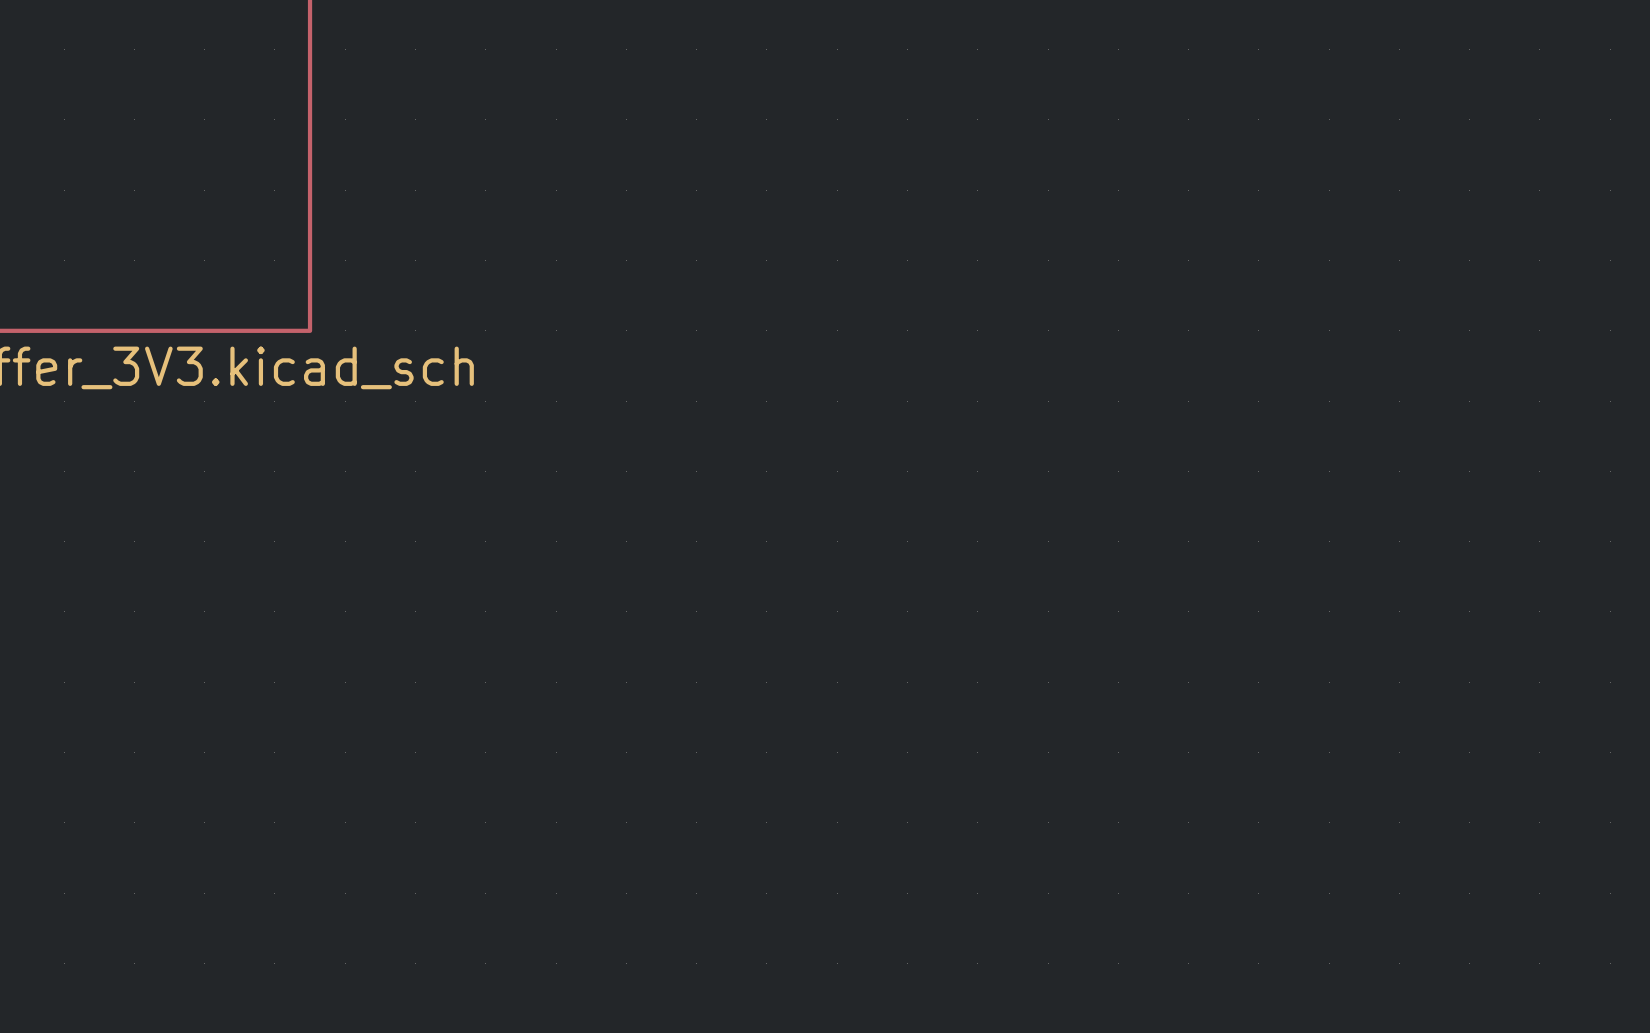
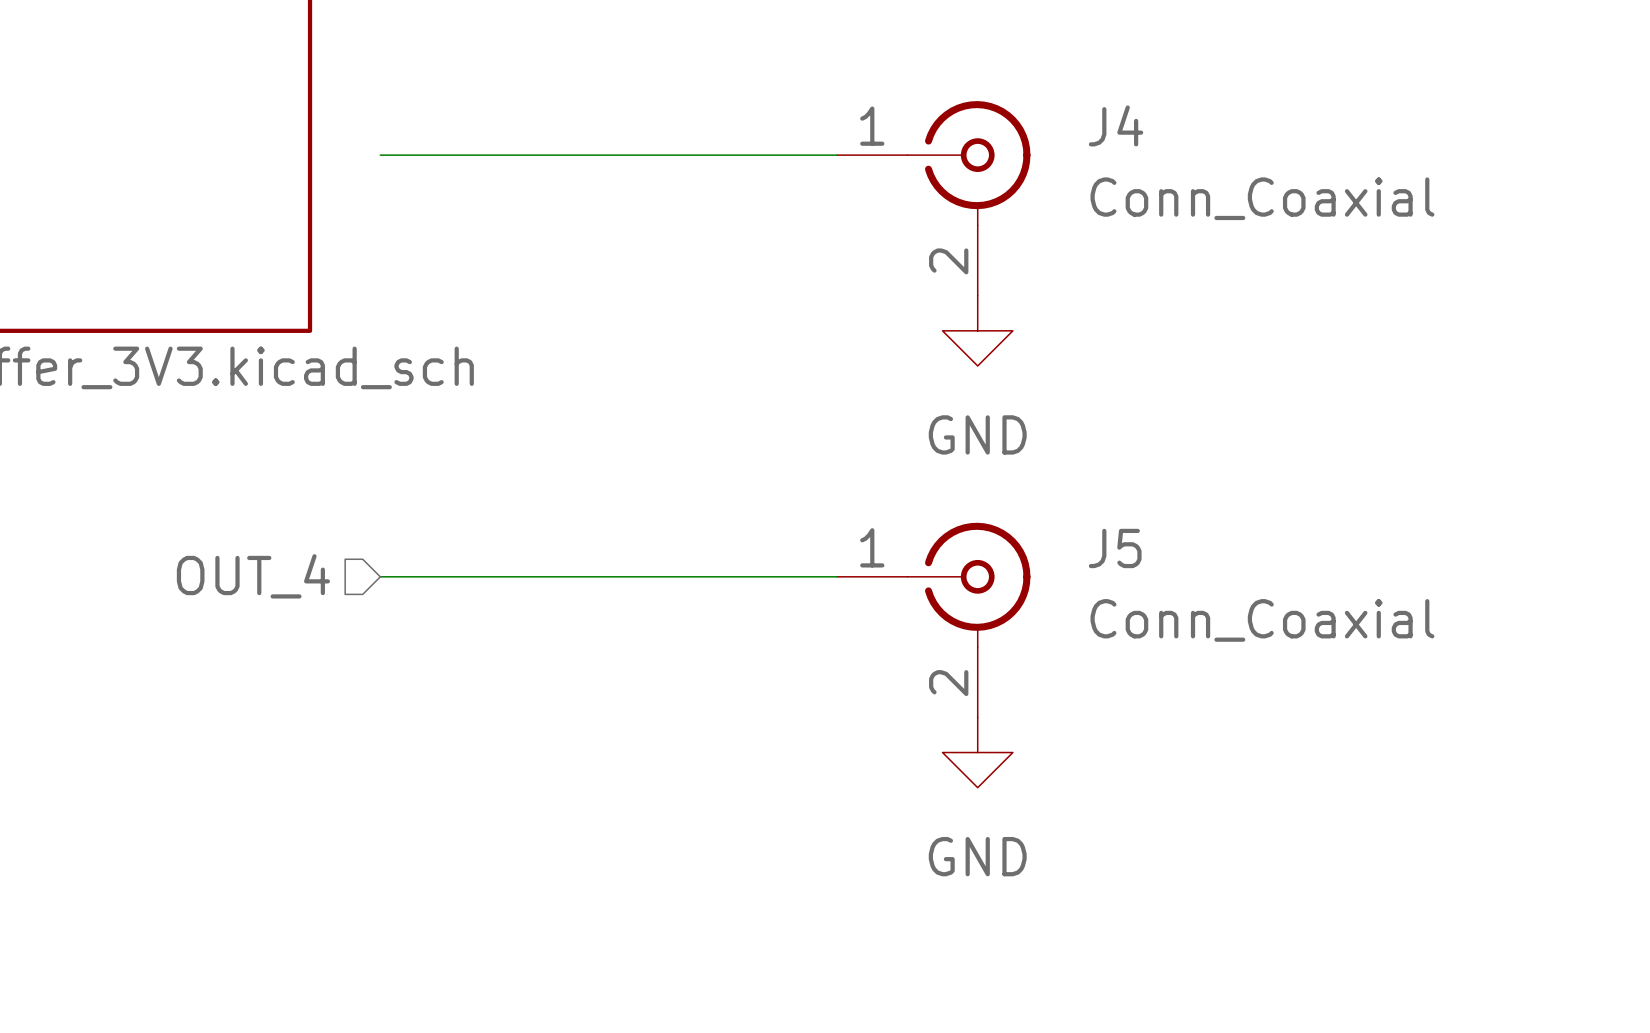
wire: none -> (380, 155) (837, 155)
J4: none -> Conn_Coaxial (933, 198)
power symbol: none -> GND (977, 330)
sheet pin: none -> OUT_4 (253, 576)
wire: none -> (380, 576) (837, 576)
J5: none -> Conn_Coaxial (933, 620)
power symbol: none -> GND (977, 752)

